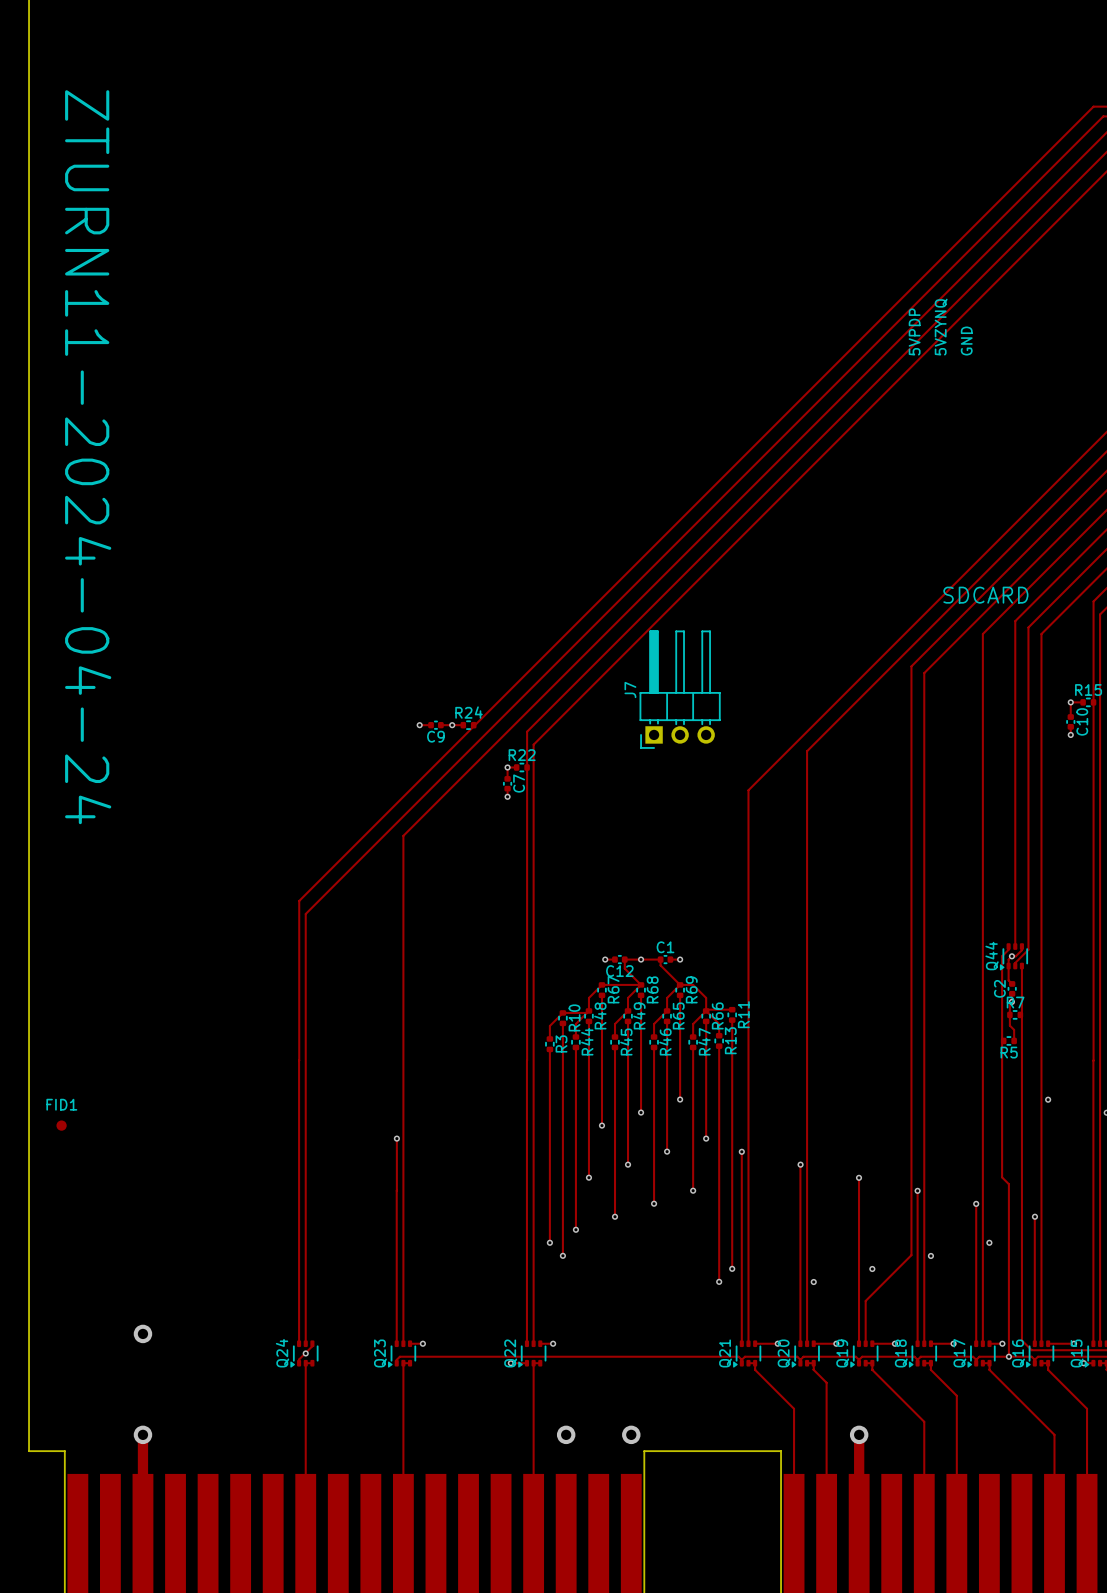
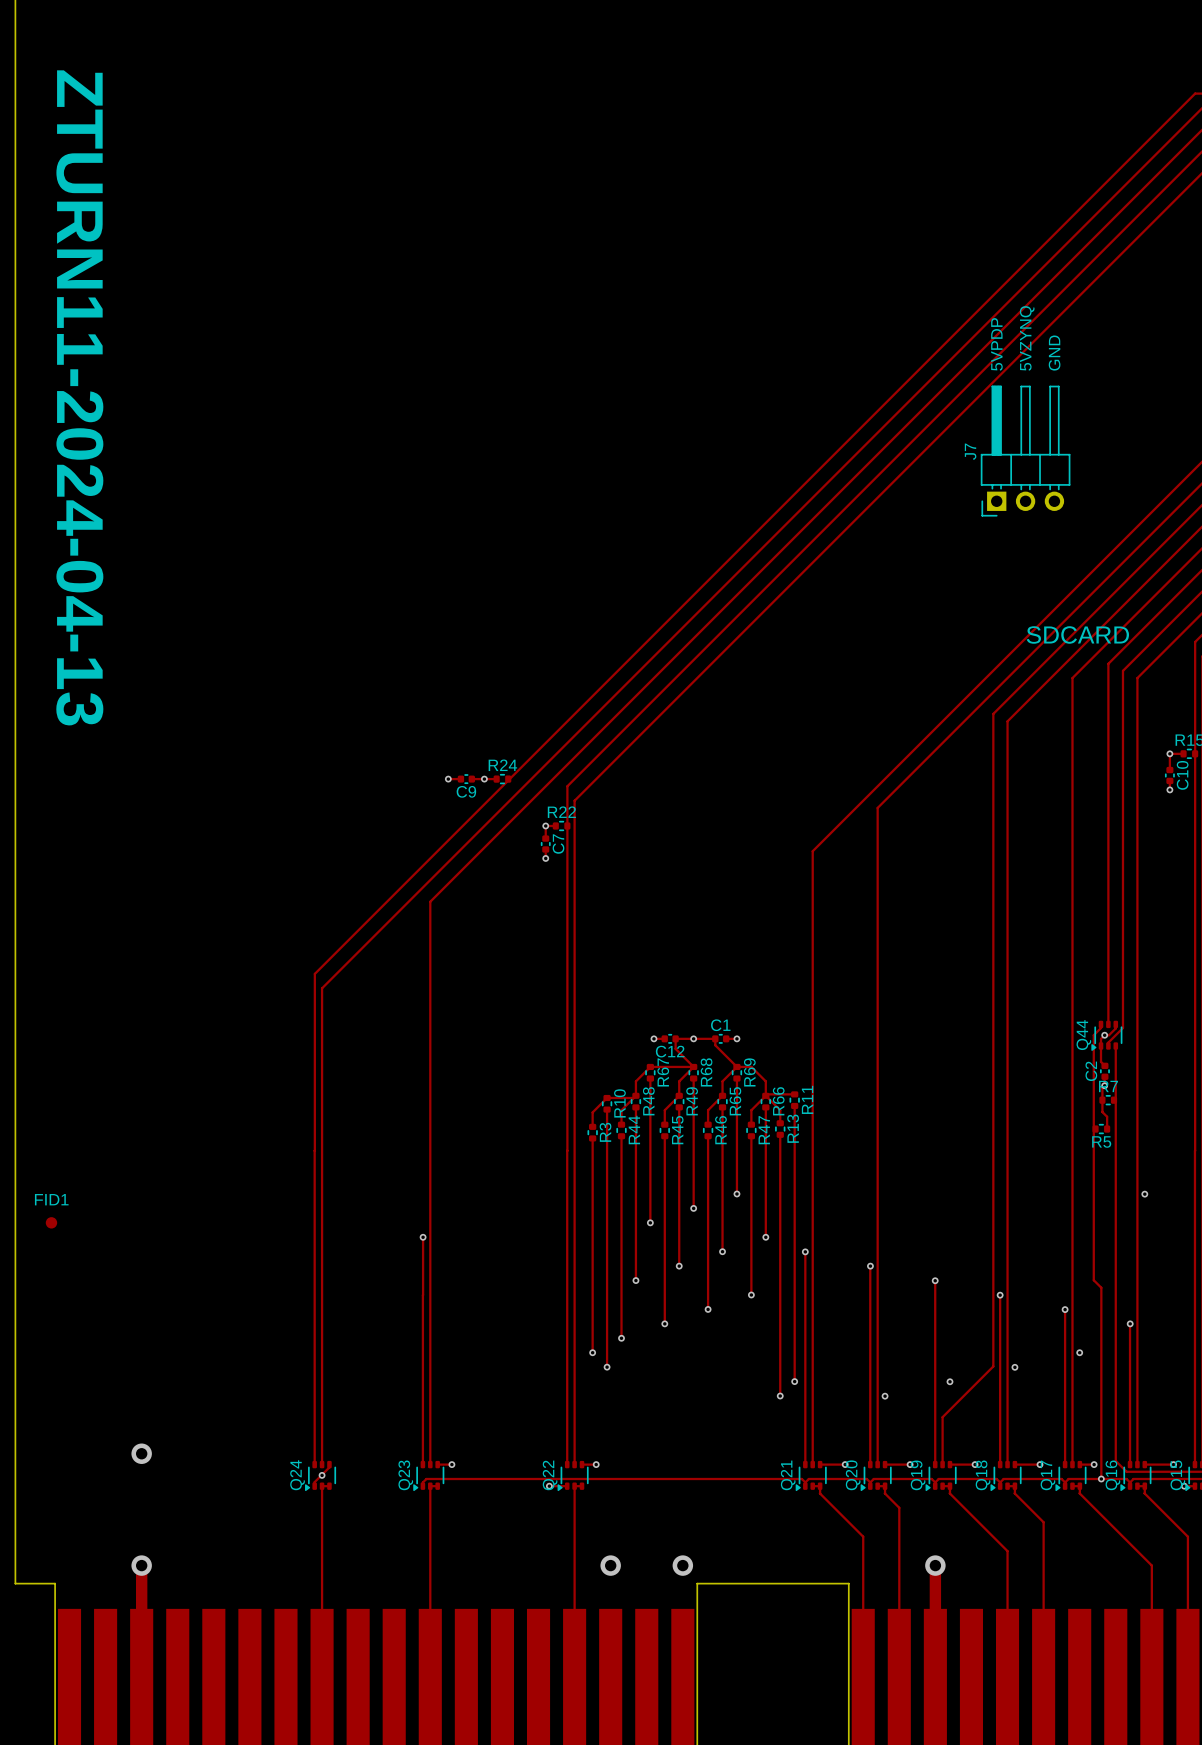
text: ZTURN11-2024-04-24 (88, 457) -> ZTURN11-2024-04-13 (79, 397)
J7 position: (680, 689) -> (1025, 451)

